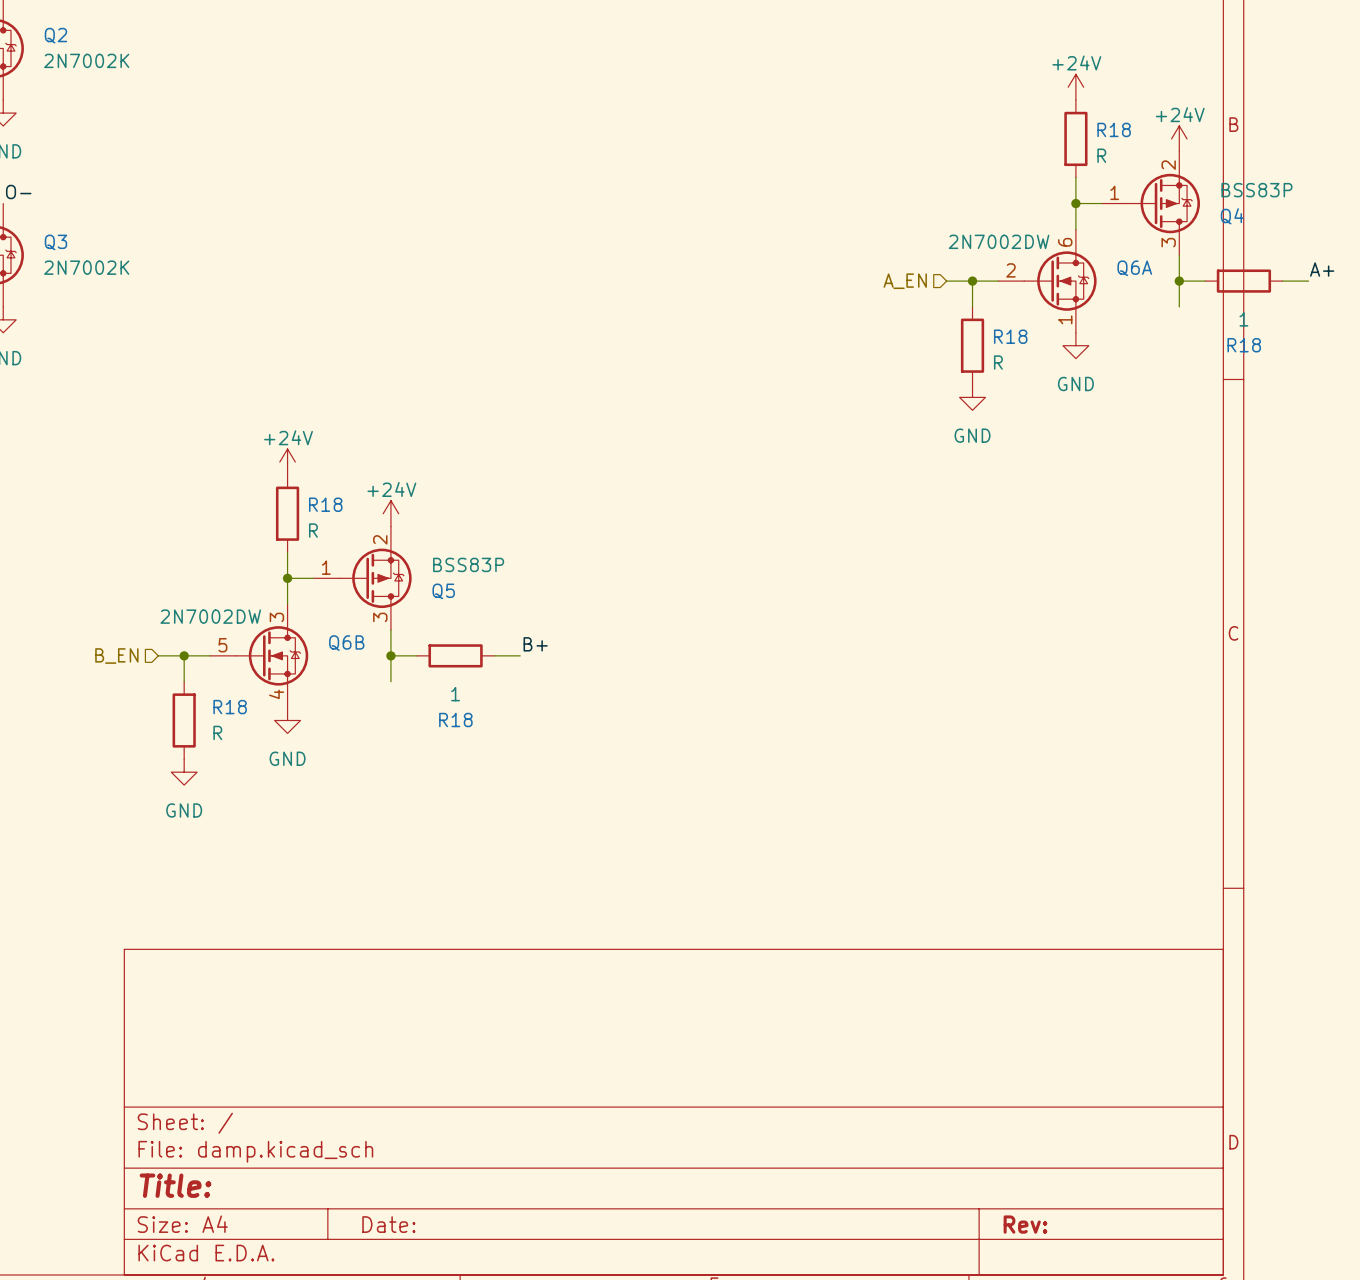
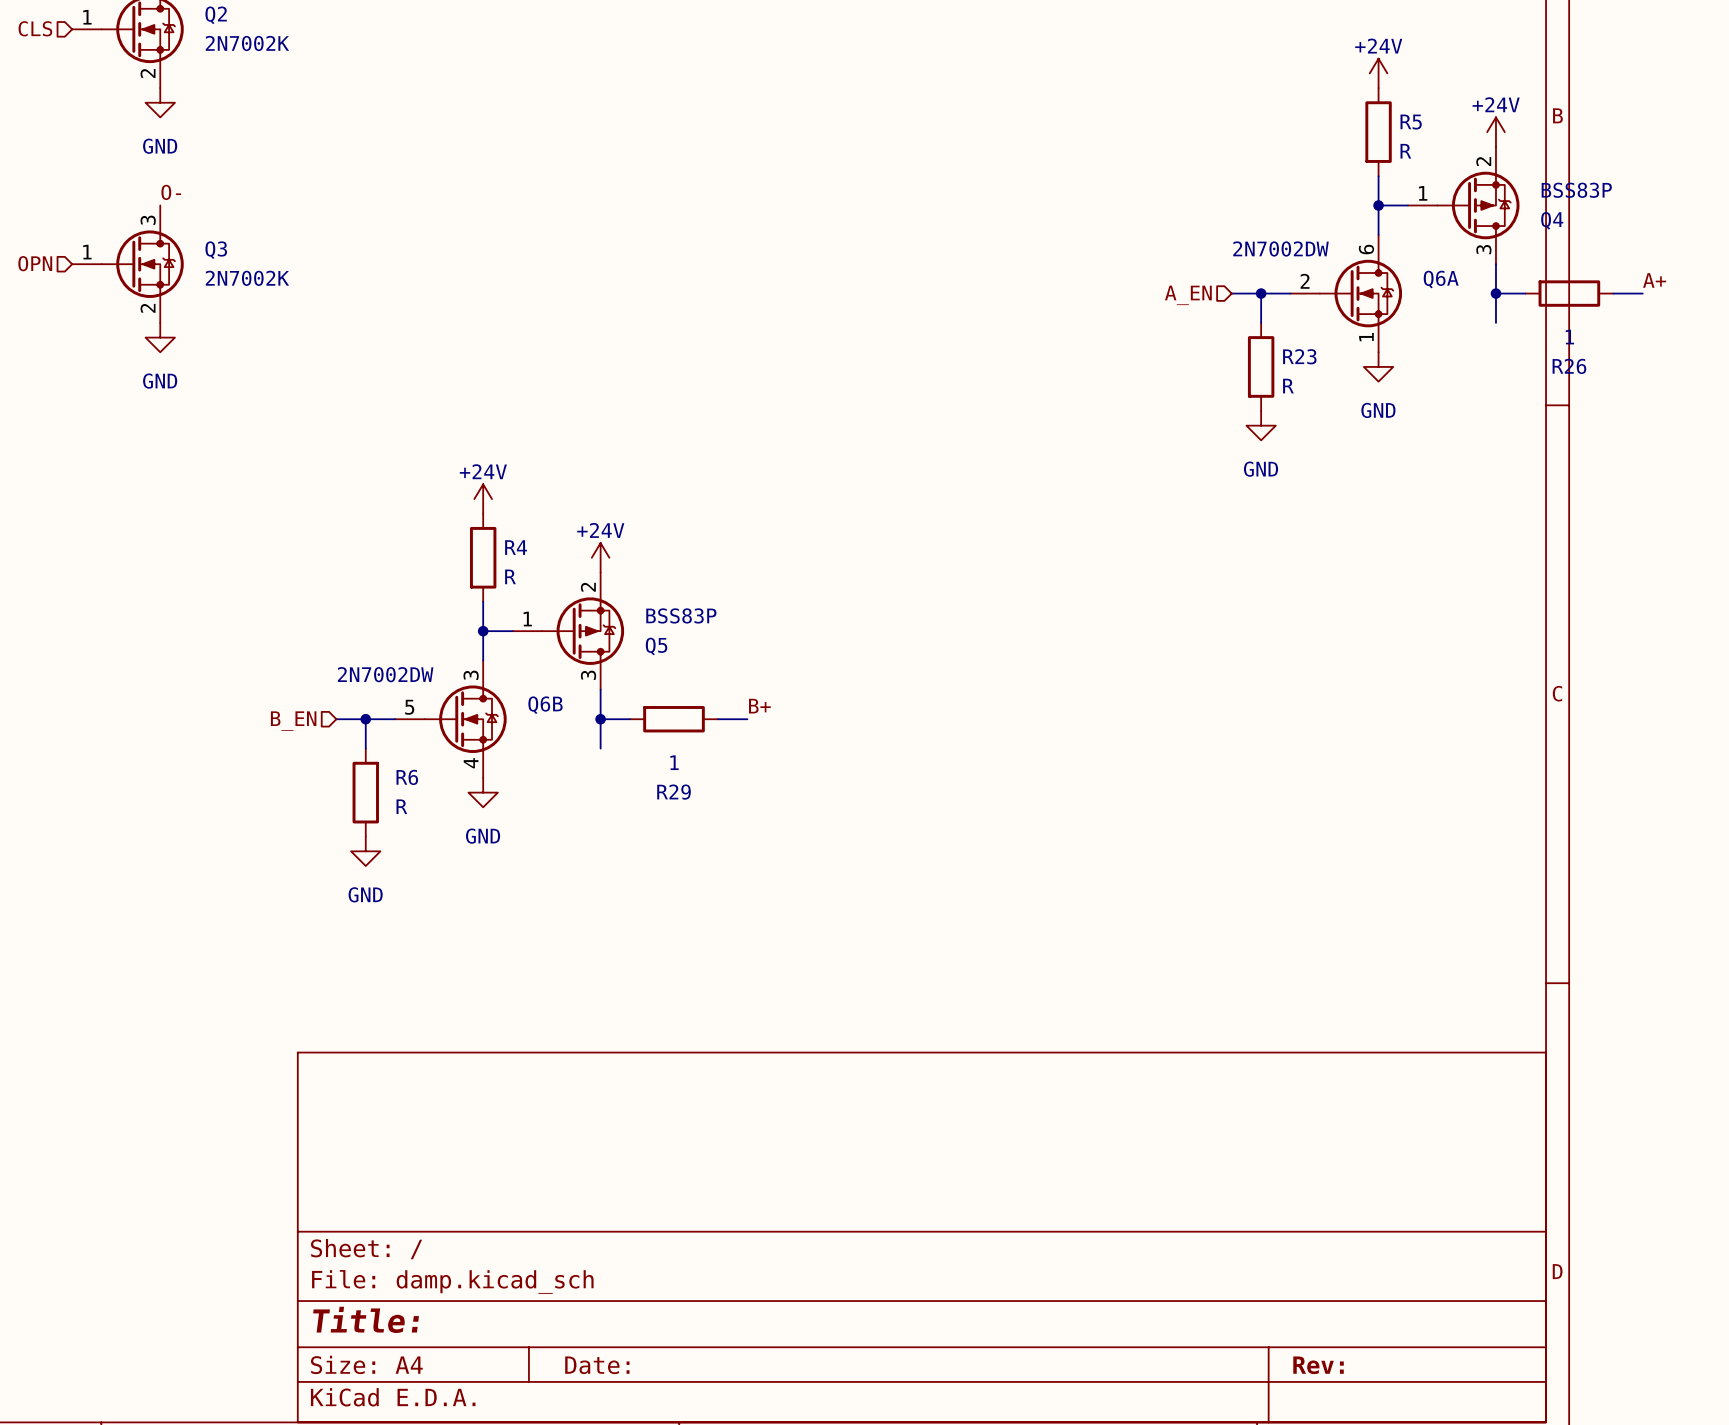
R18 name: R18 (1114, 129) -> R5 (1411, 122)
R18 name: R18 (1010, 336) -> R23 (1299, 356)
R18 name: R18 (1244, 345) -> R26 (1569, 366)
R18 name: R18 (325, 504) -> R4 (516, 547)
R18 name: R18 (230, 707) -> R6 (407, 777)
R18 name: R18 (455, 720) -> R29 (674, 792)

